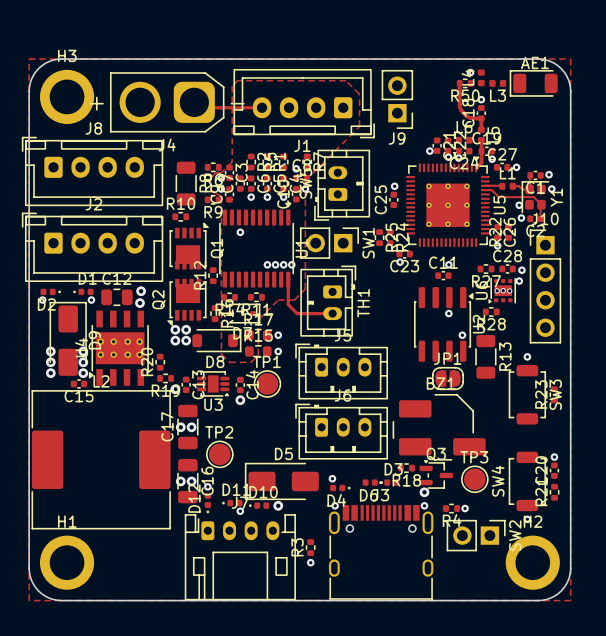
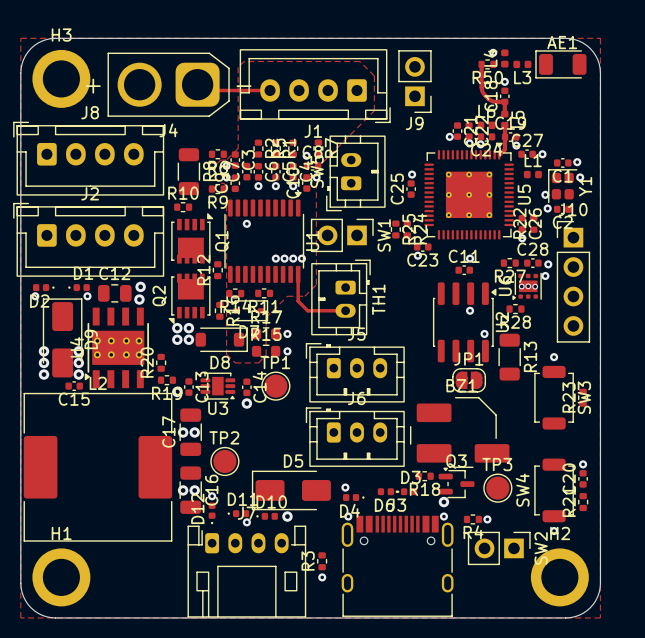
track: (530, 175) (529, 189) (512, 186) -> none
track: (485, 185) (502, 186) -> none
track: (485, 190) (491, 190) (498, 197) (533, 197) (541, 204) (540, 218) -> none

